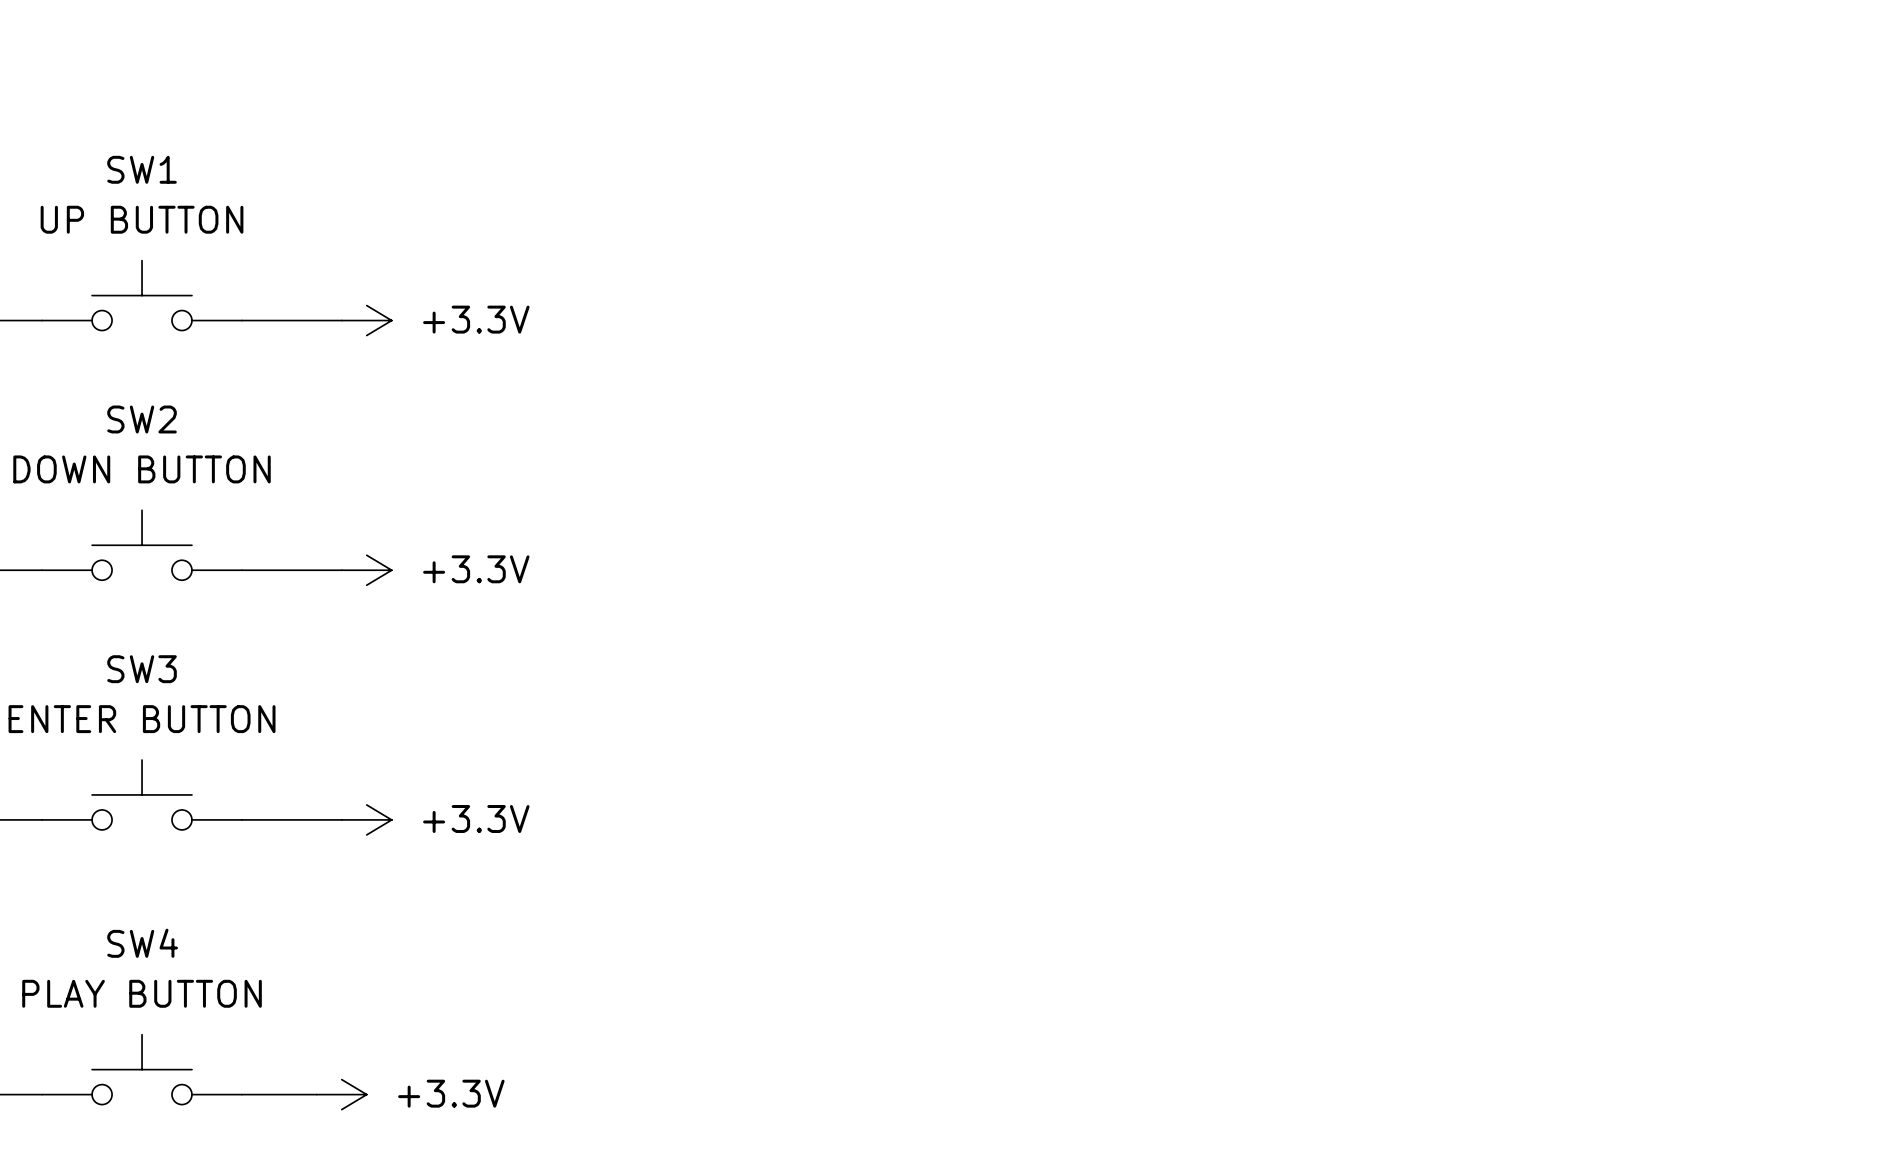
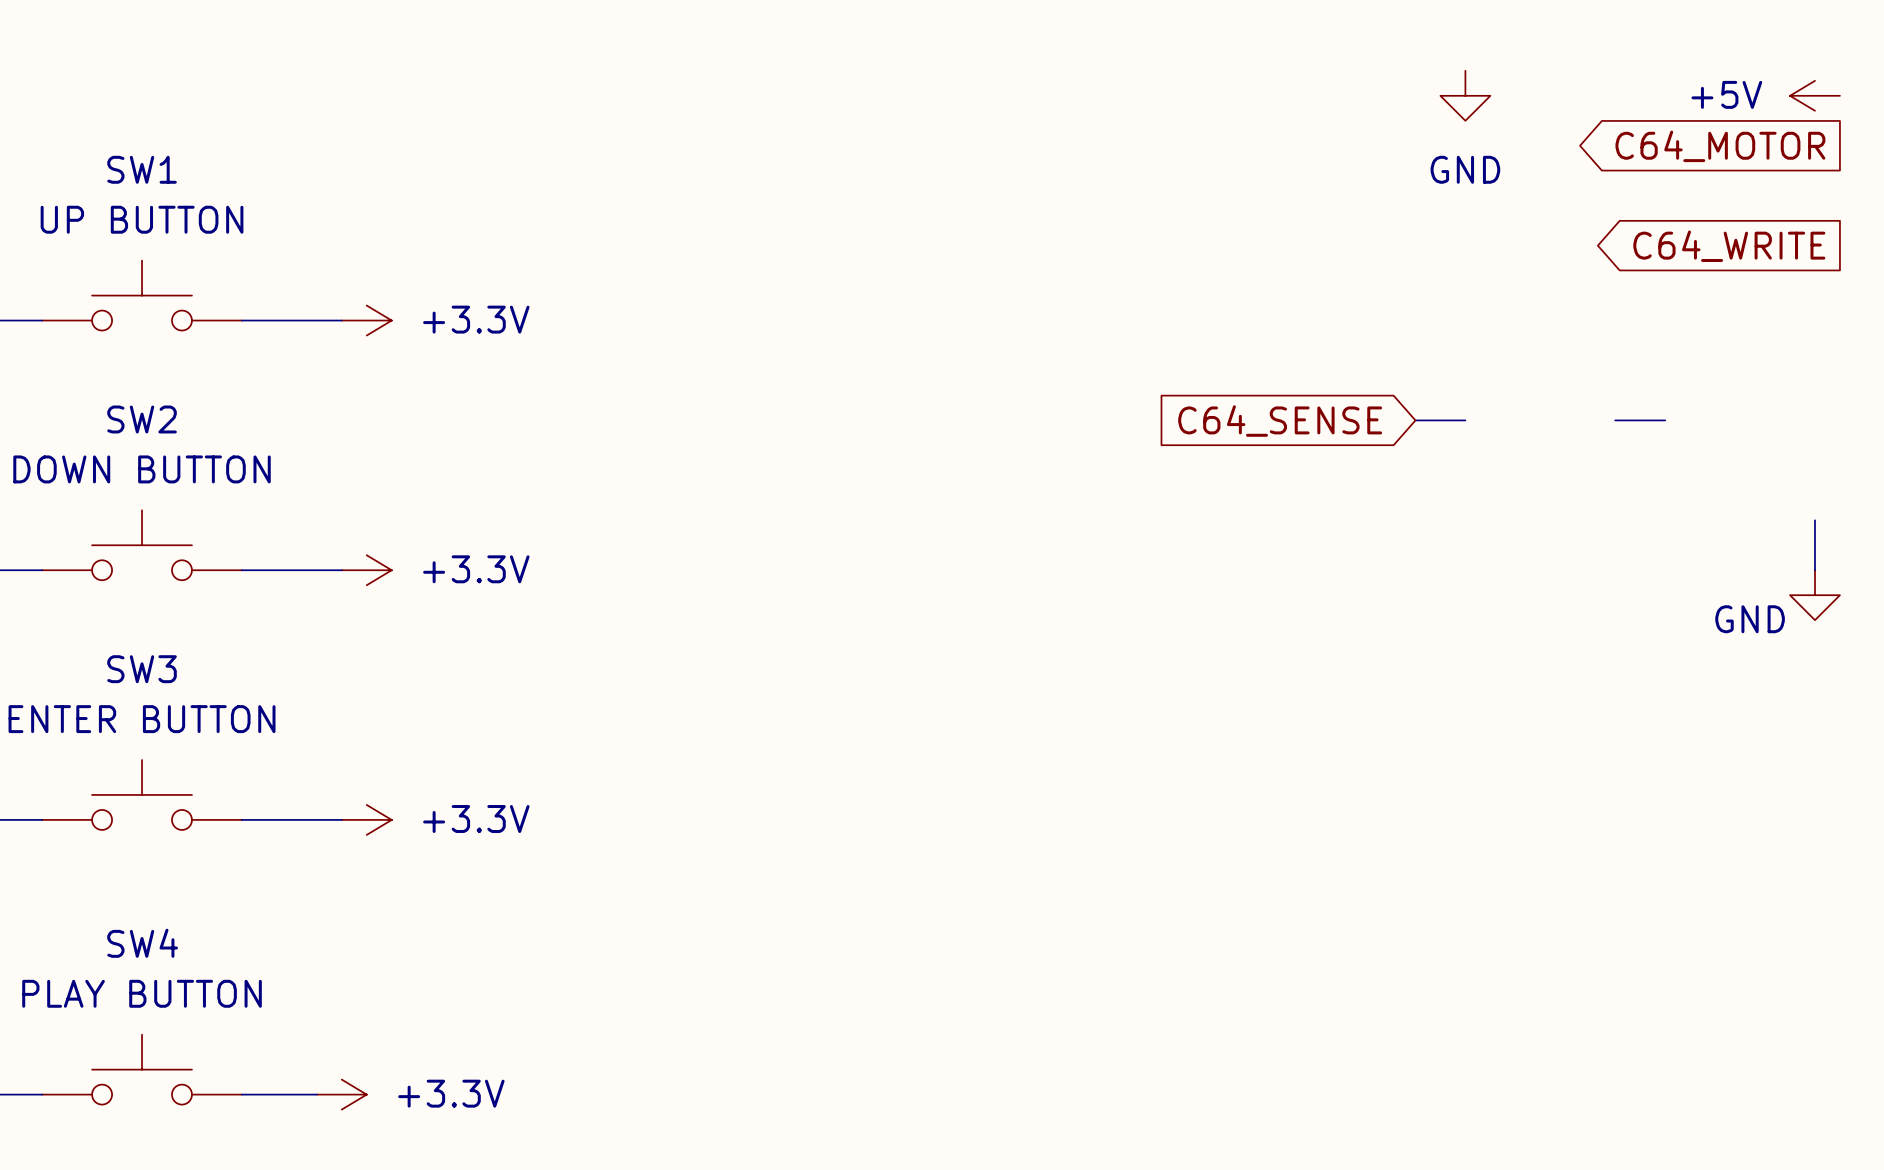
power symbol: none -> GND (1465, 95)
power symbol: none -> +5V (1814, 95)
global label: none -> C64_MOTOR (1720, 146)
global label: none -> C64_WRITE (1729, 246)
wire: none -> (1415, 420) (1465, 420)
wire: none -> (1615, 420) (1665, 420)
global label: none -> C64_SENSE (1280, 421)
wire: none -> (1814, 520) (1814, 570)
power symbol: none -> GND (1814, 595)

